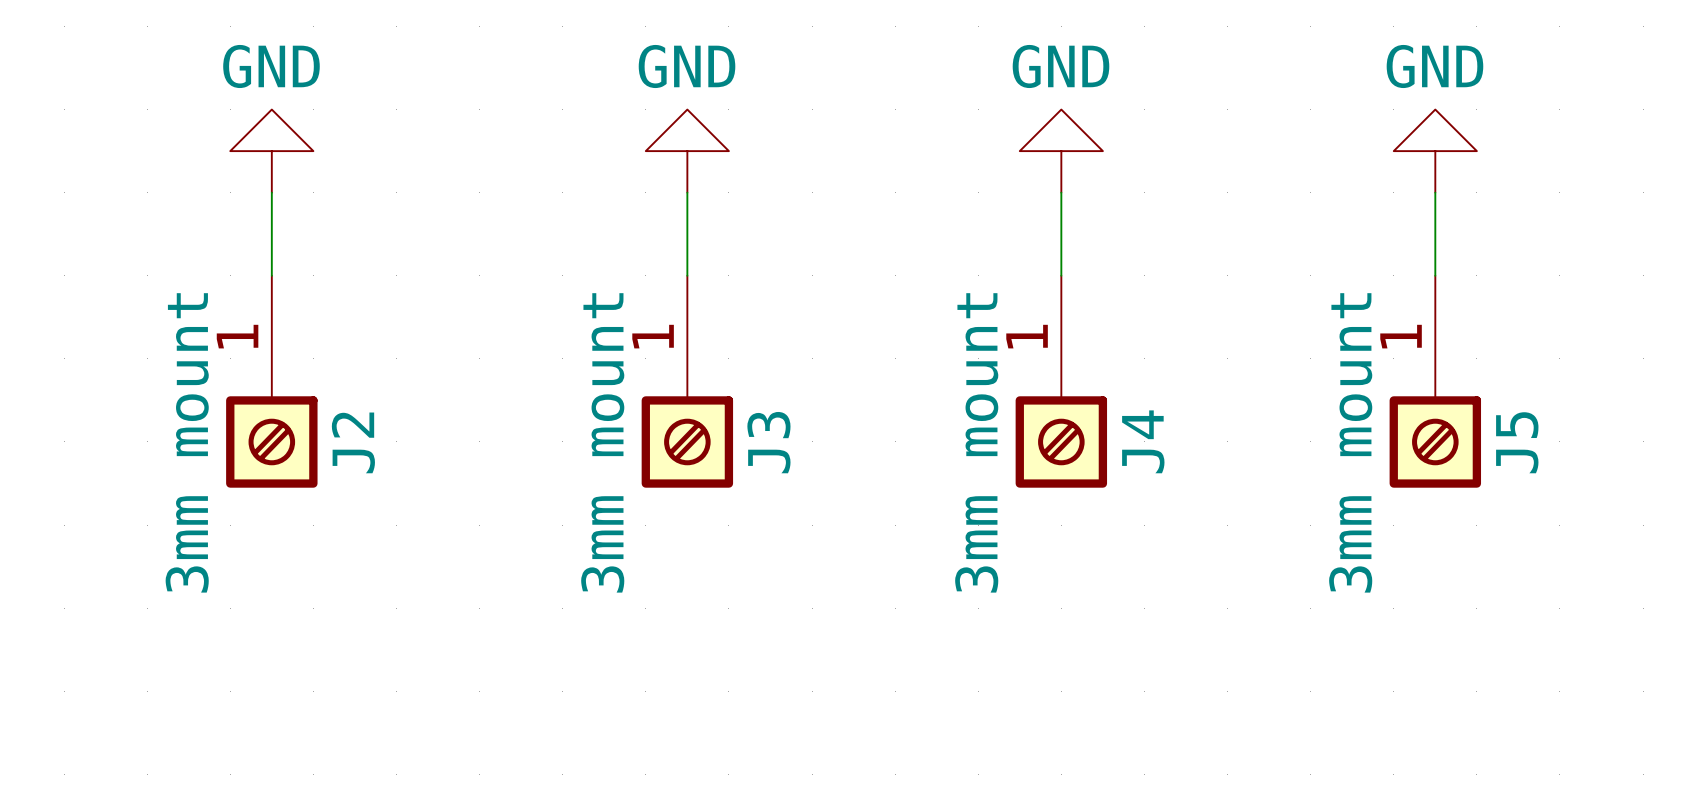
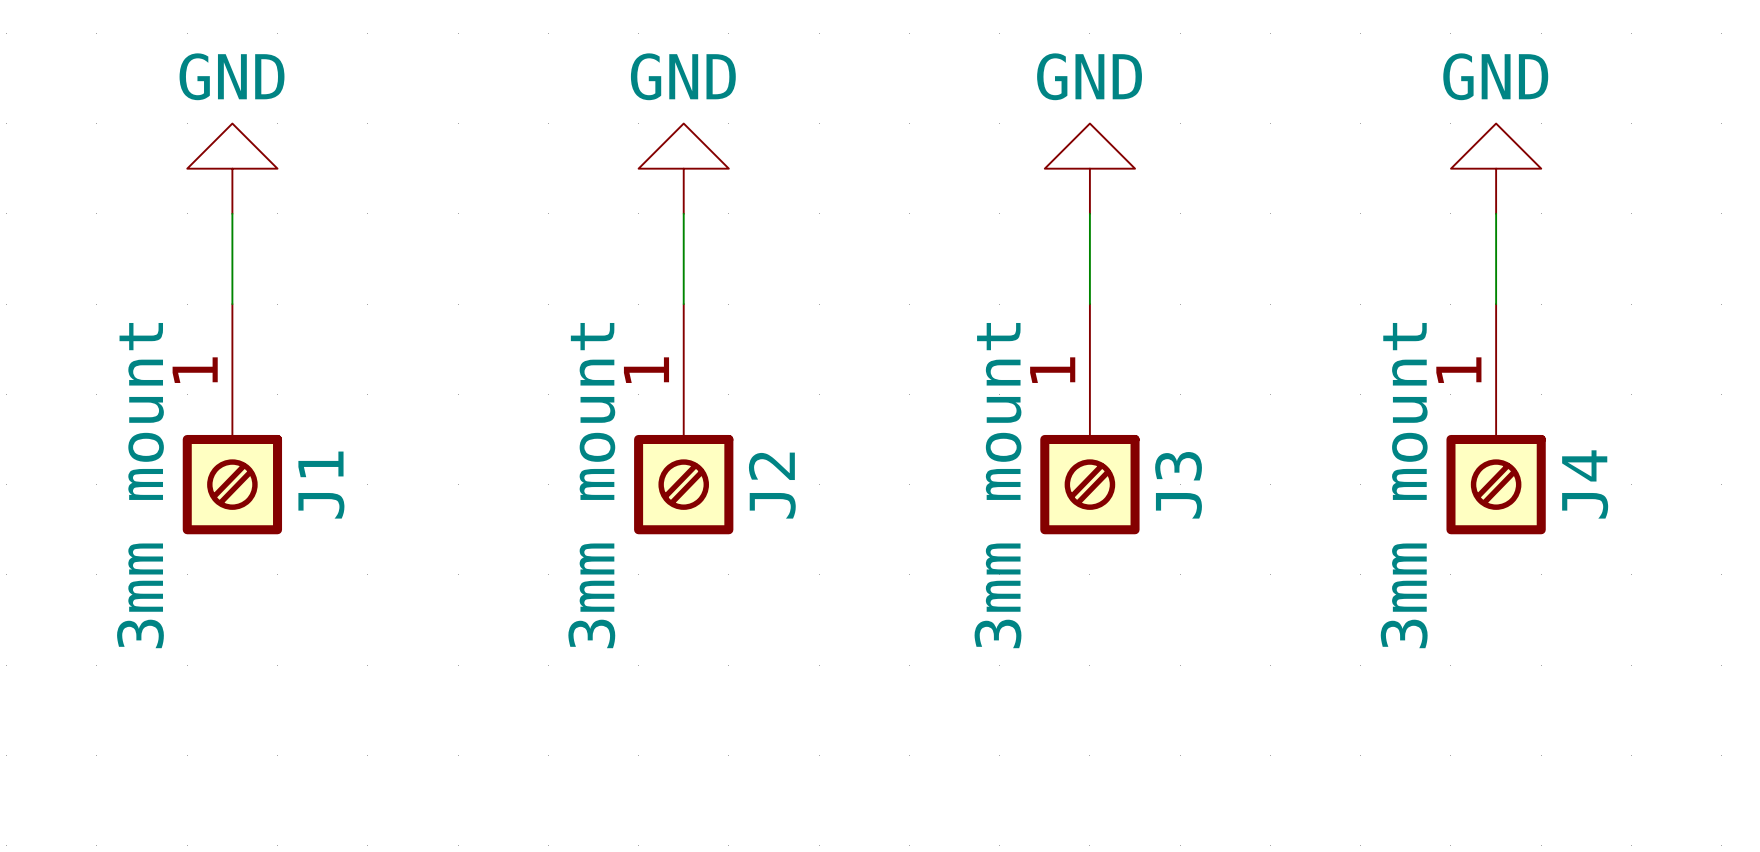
J4 name: J4 (1143, 441) -> J3 (1178, 485)
J2 name: J2 (353, 442) -> J1 (321, 485)
J3 name: J3 (768, 442) -> J2 (772, 485)
J5 name: J5 (1517, 442) -> J4 (1585, 484)

